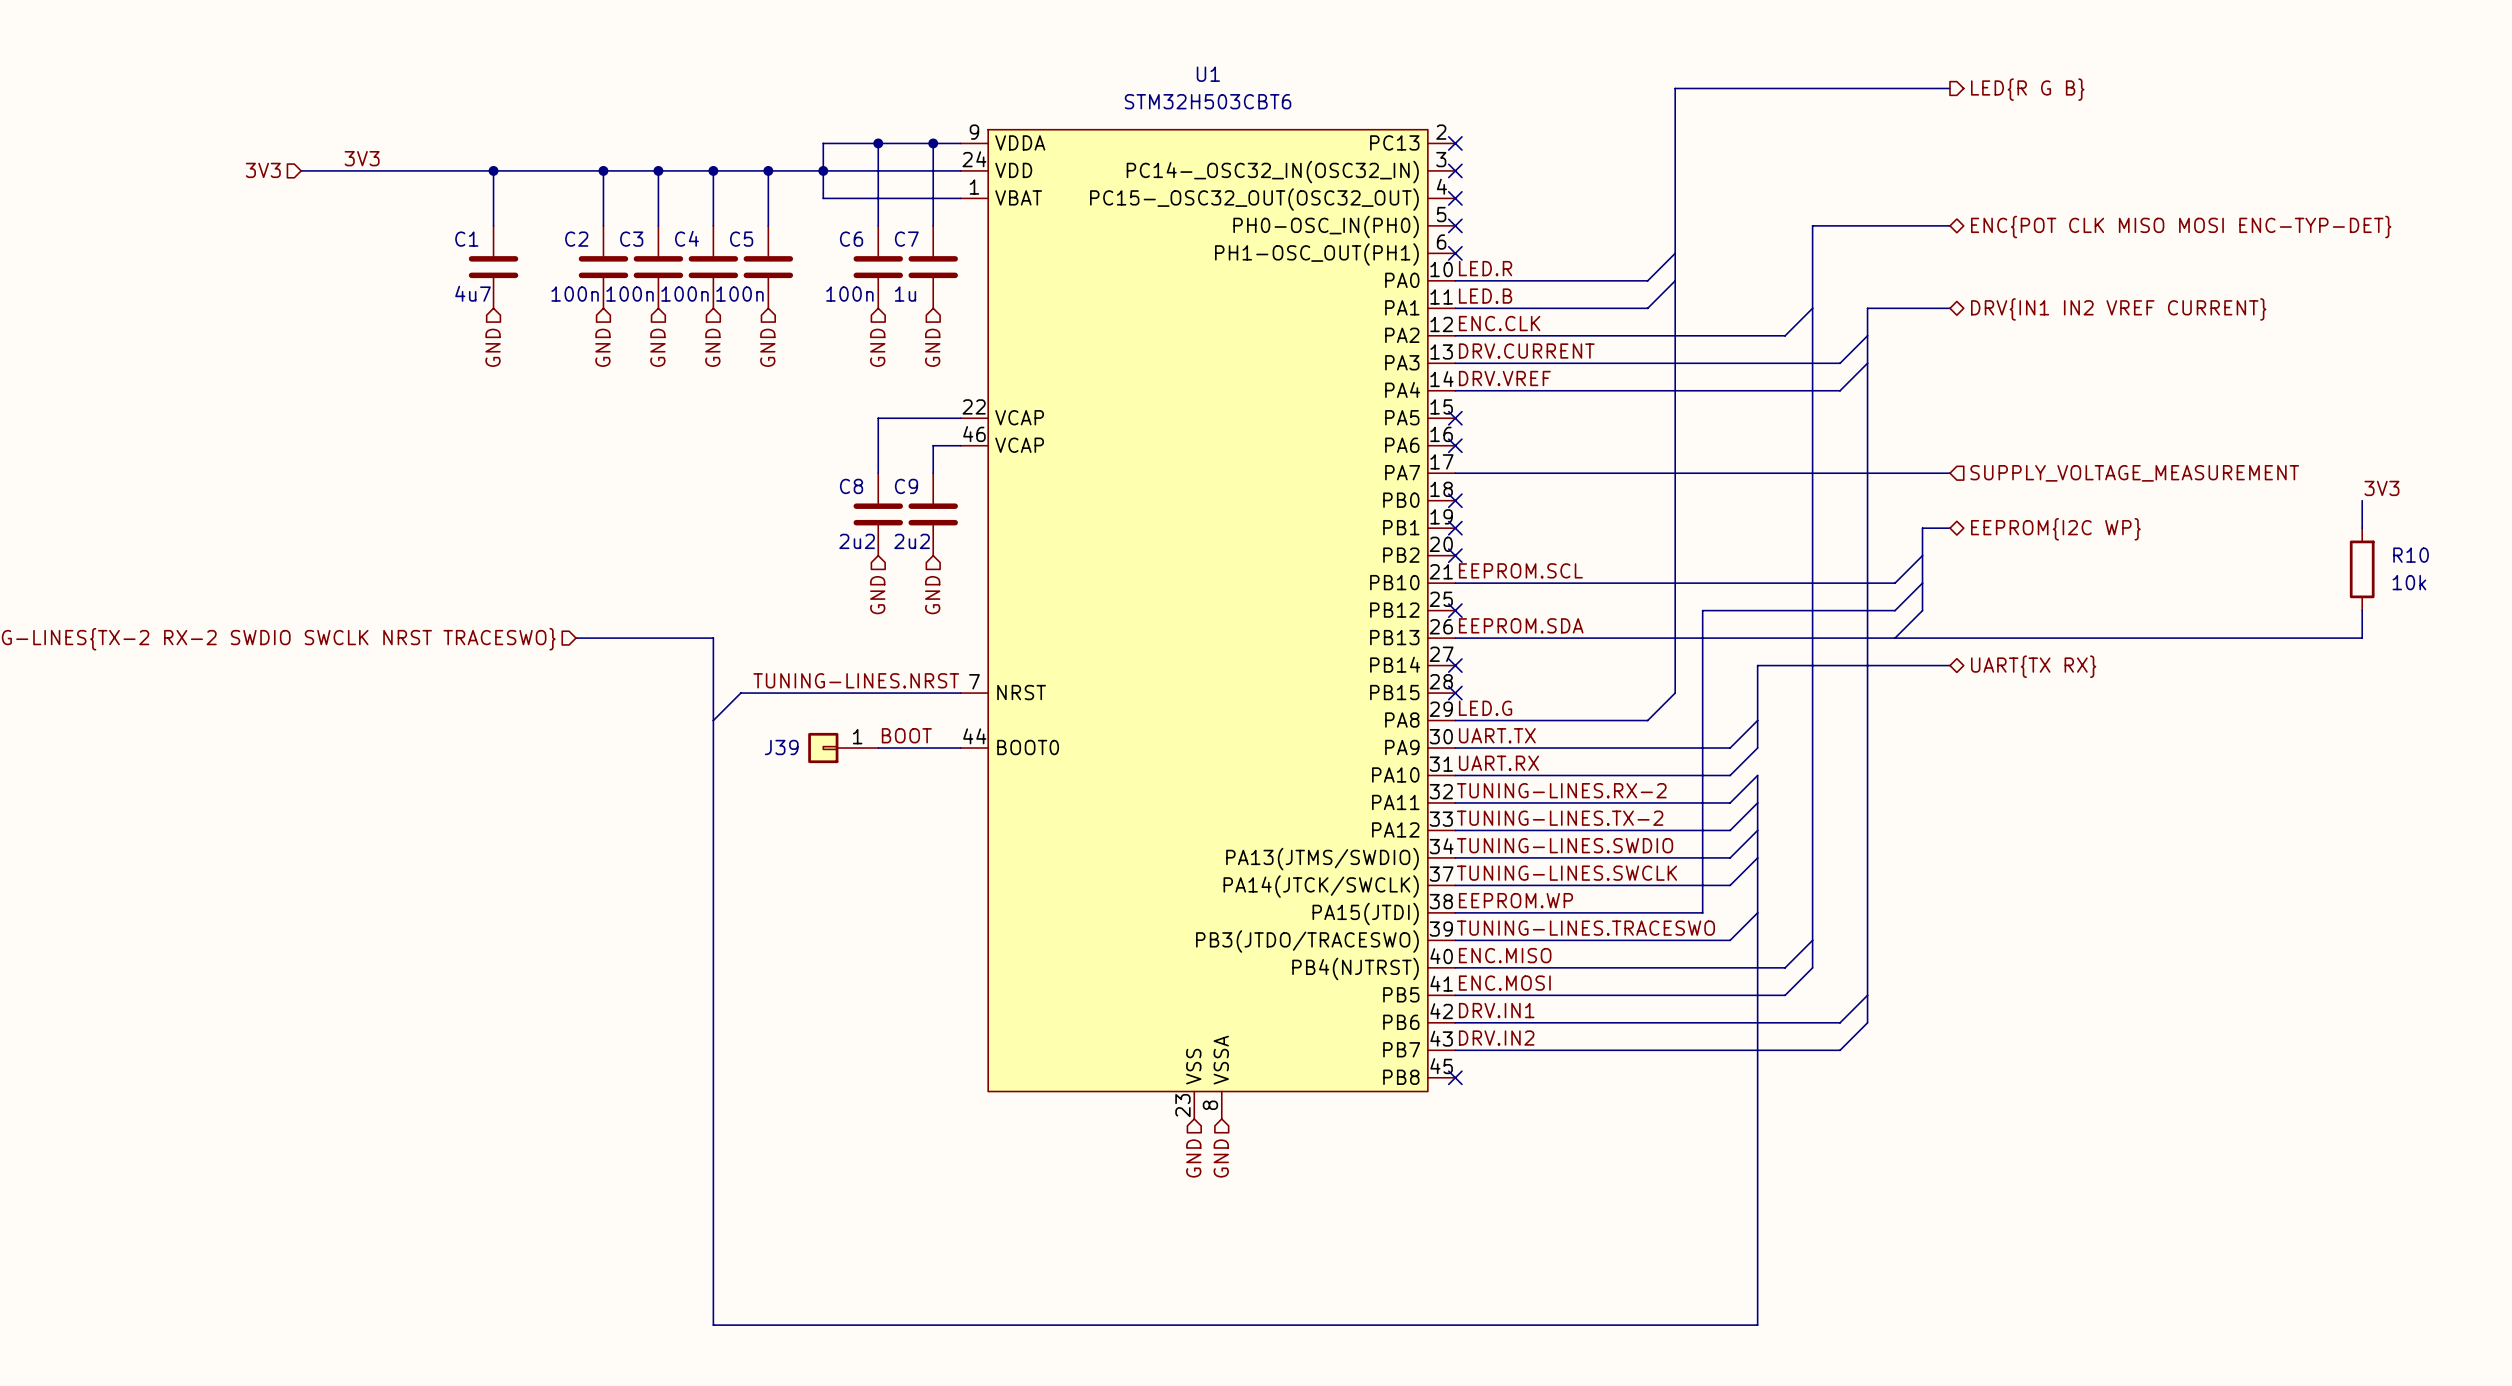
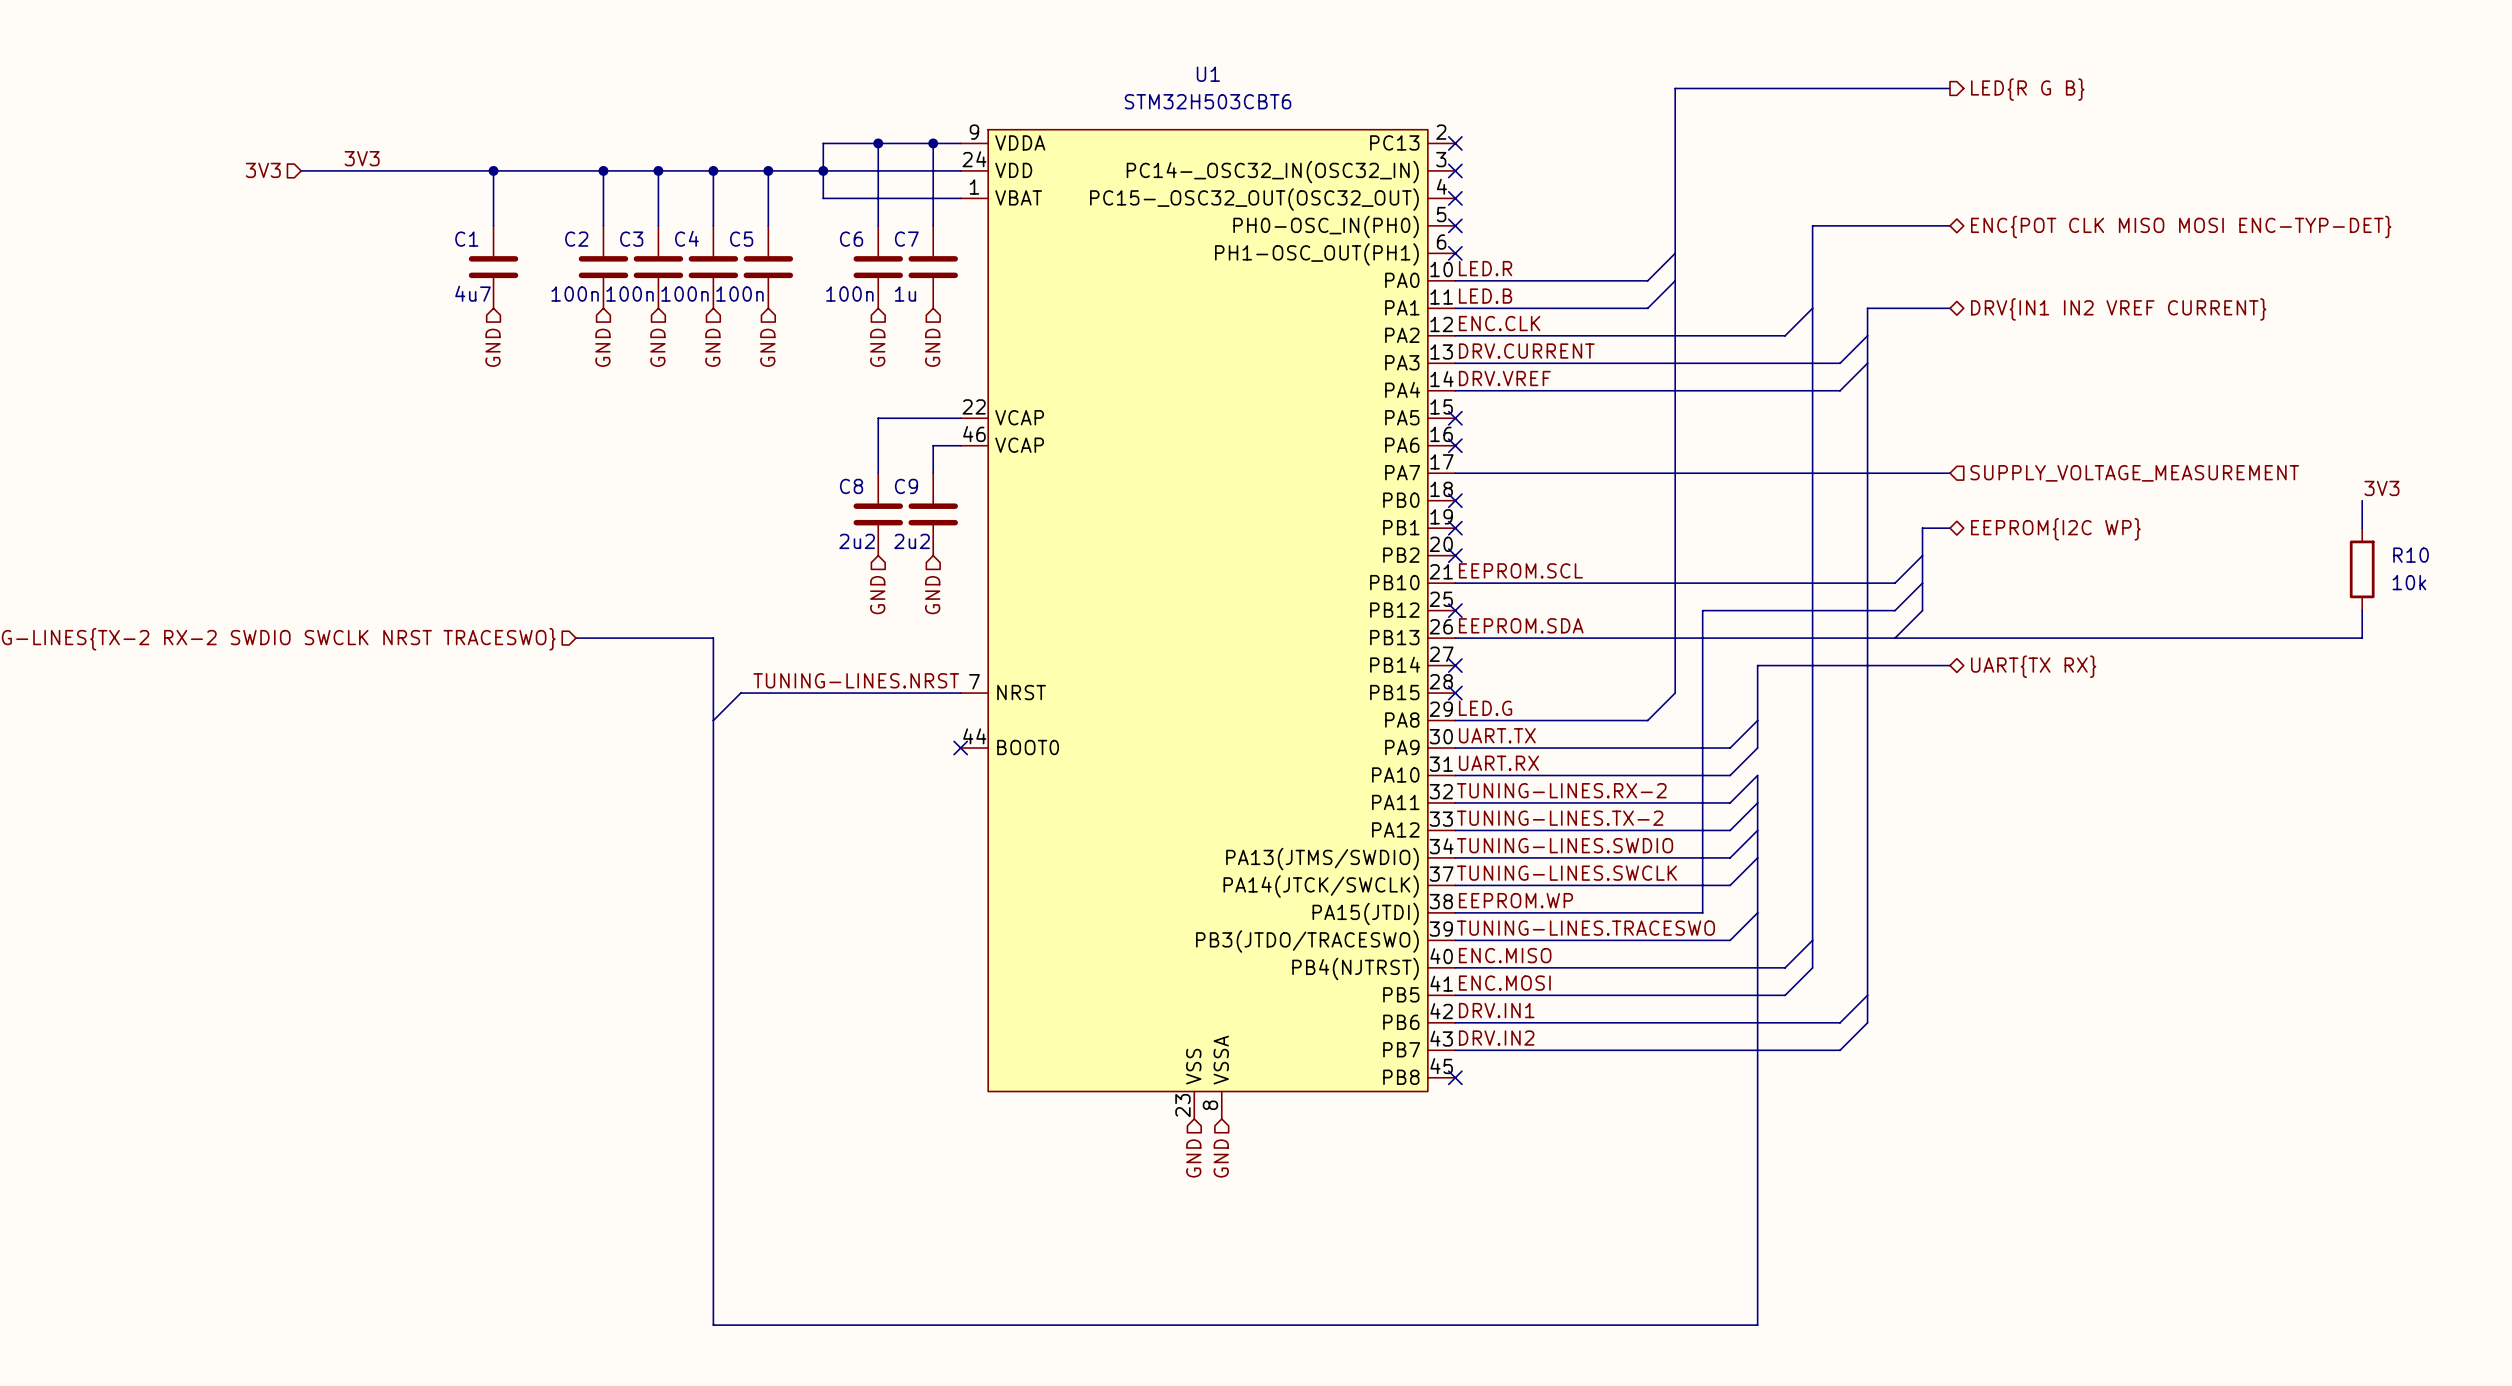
label: BOOT (906, 735) -> none
J39: (843, 748) -> none
wire: (878, 748) (960, 748) -> none
no-connect mark: none -> (960, 748)

